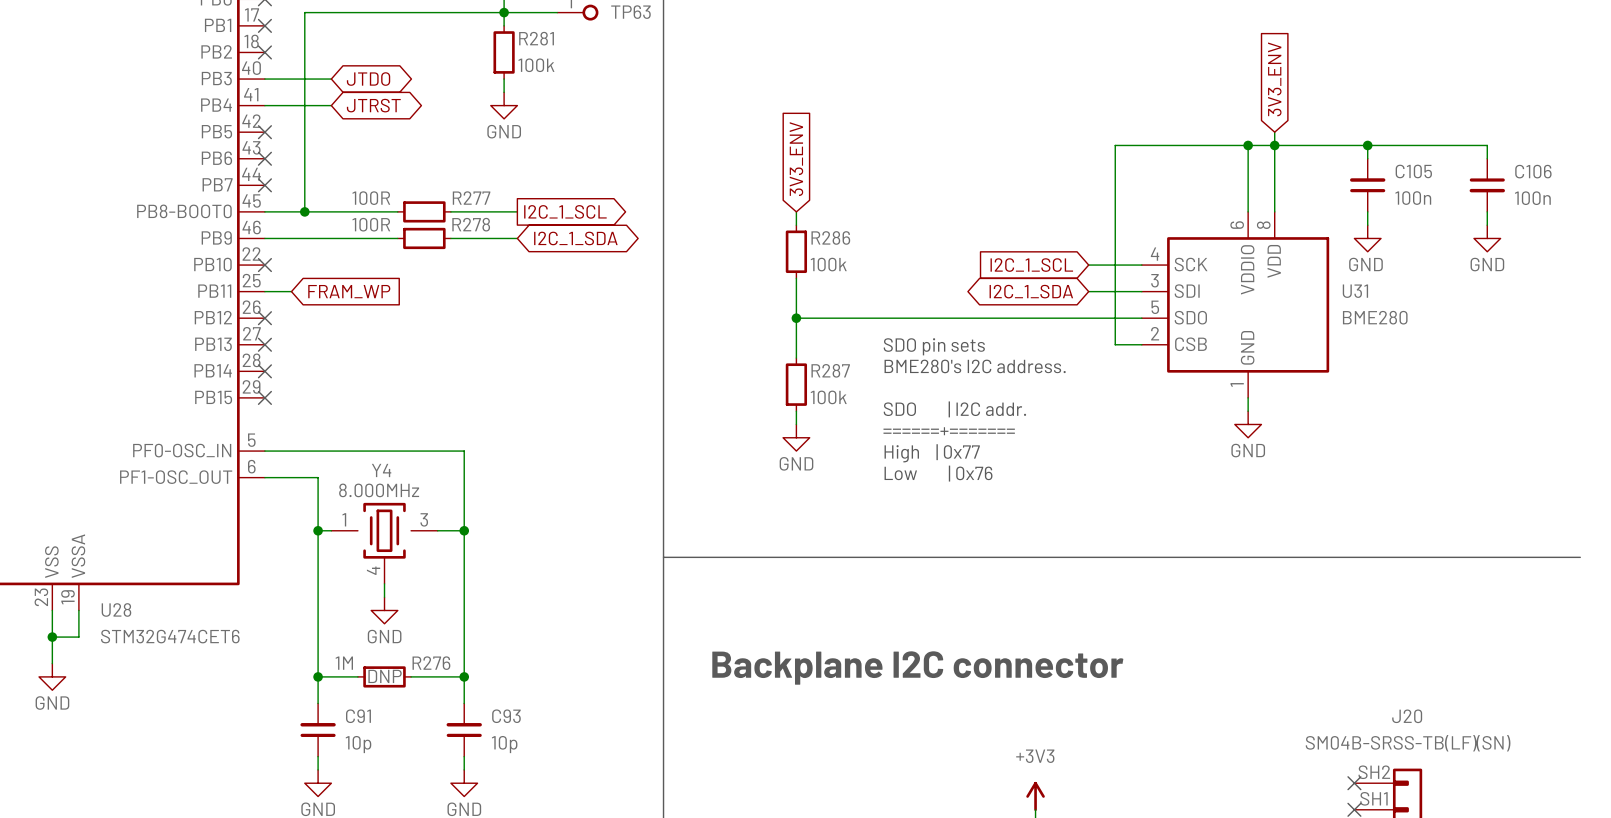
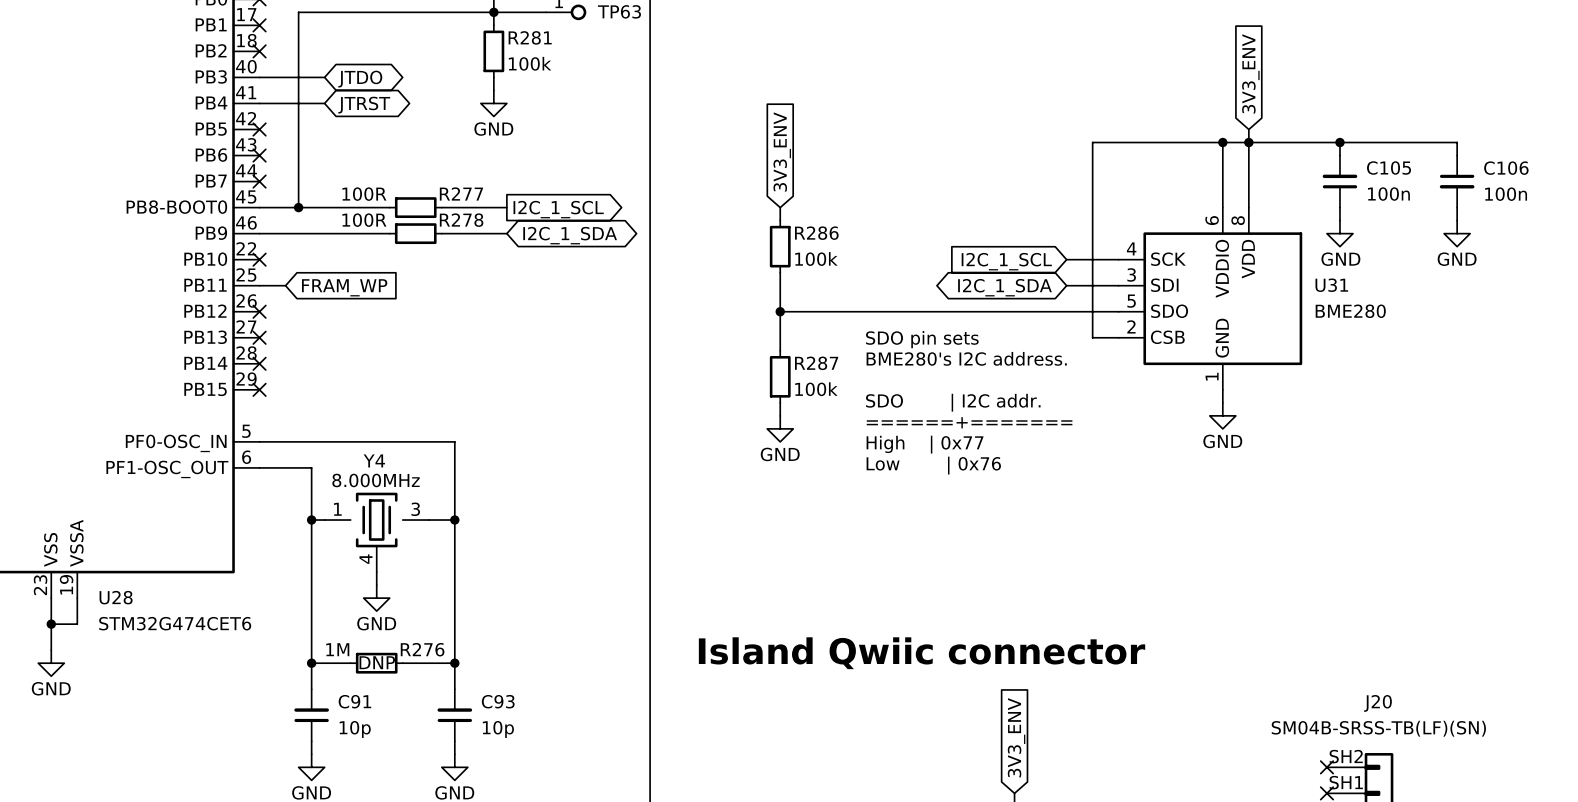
line: (663, 557) (1580, 557) -> none
text: Backplane I2C connector (917, 668) -> Island Qwiic connector (922, 653)
global label: none -> 3V3_ENV (1016, 737)
power symbol: +3V3 (1035, 796) -> none

